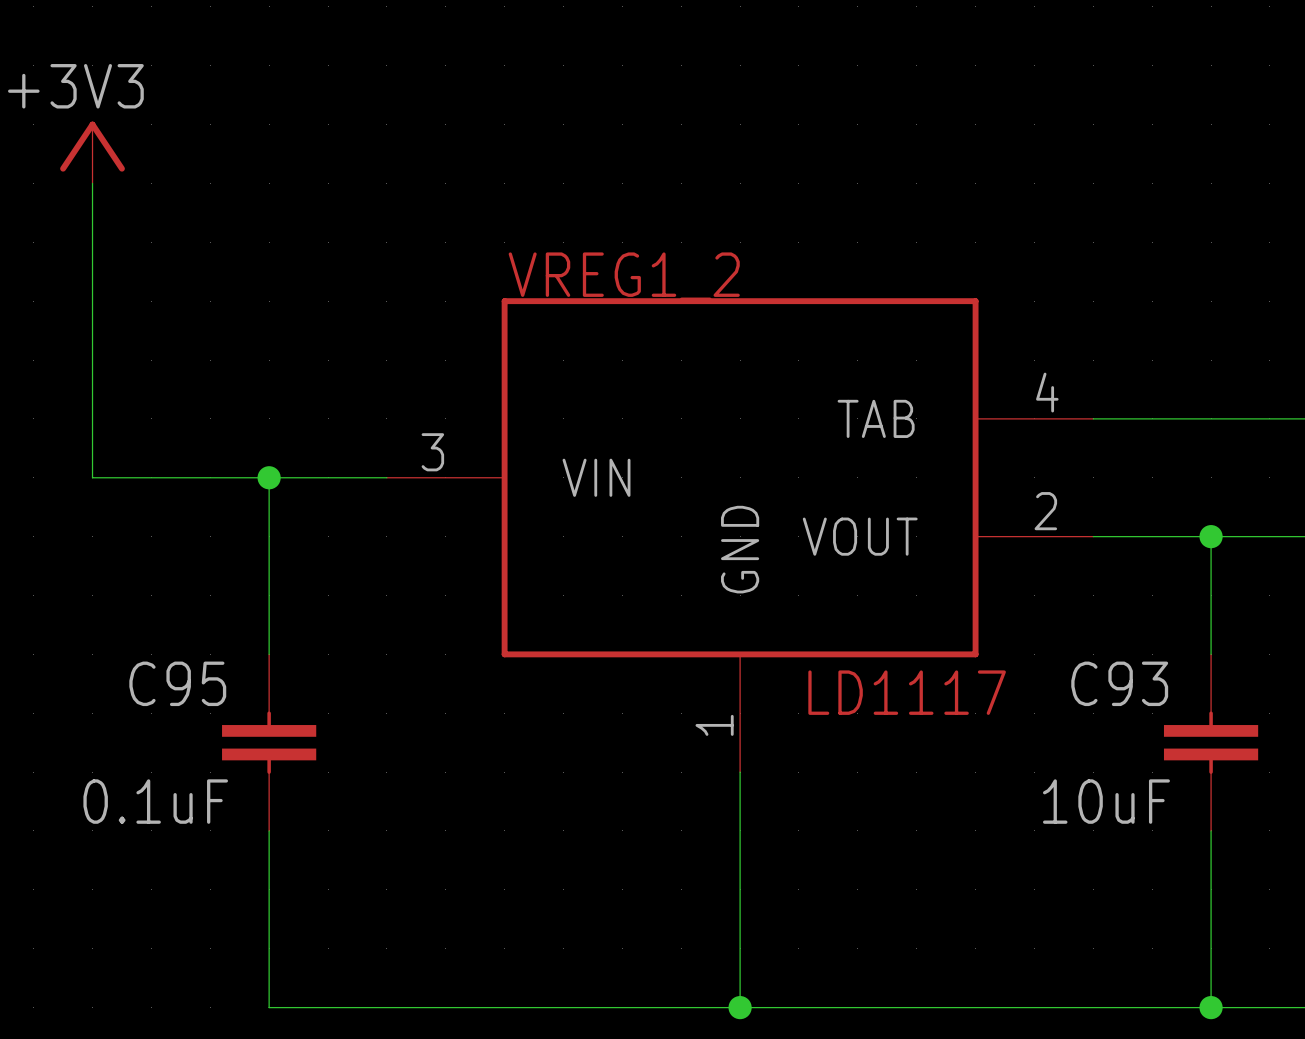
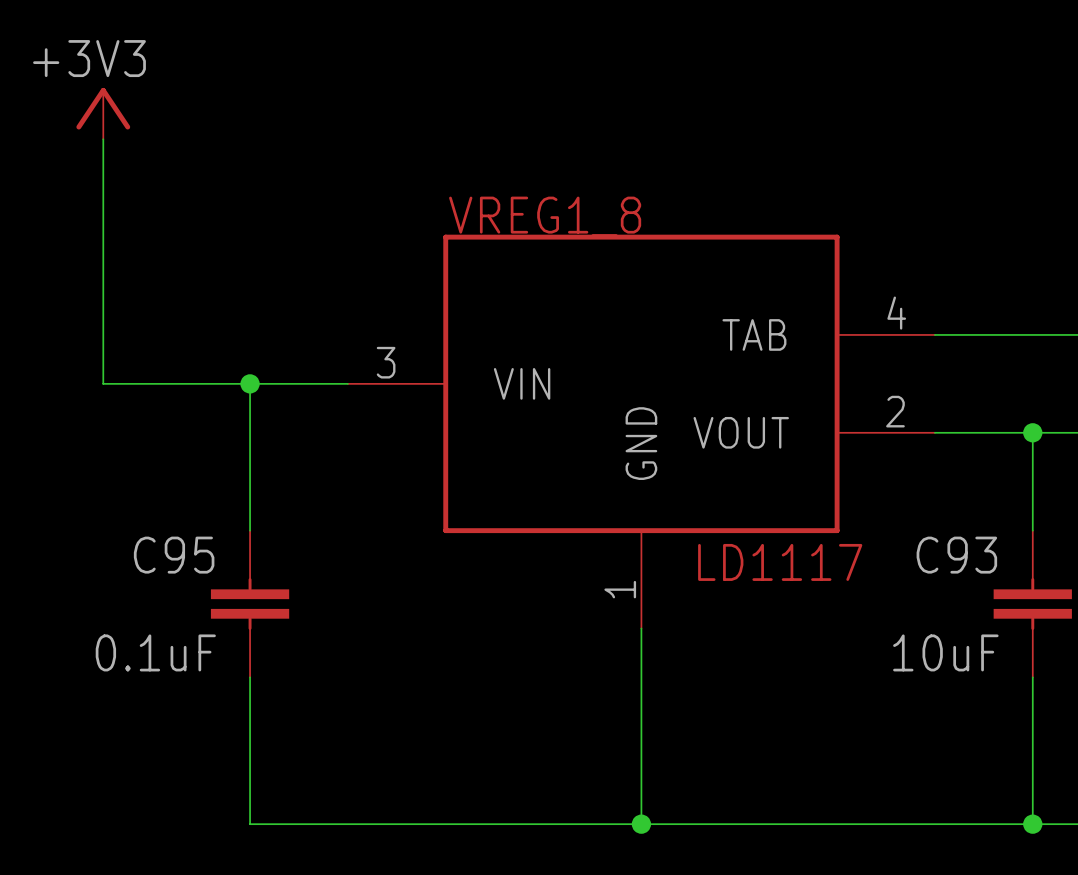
VREG1_2 name: VREG1_2 (624, 276) -> VREG1_8 (545, 216)

